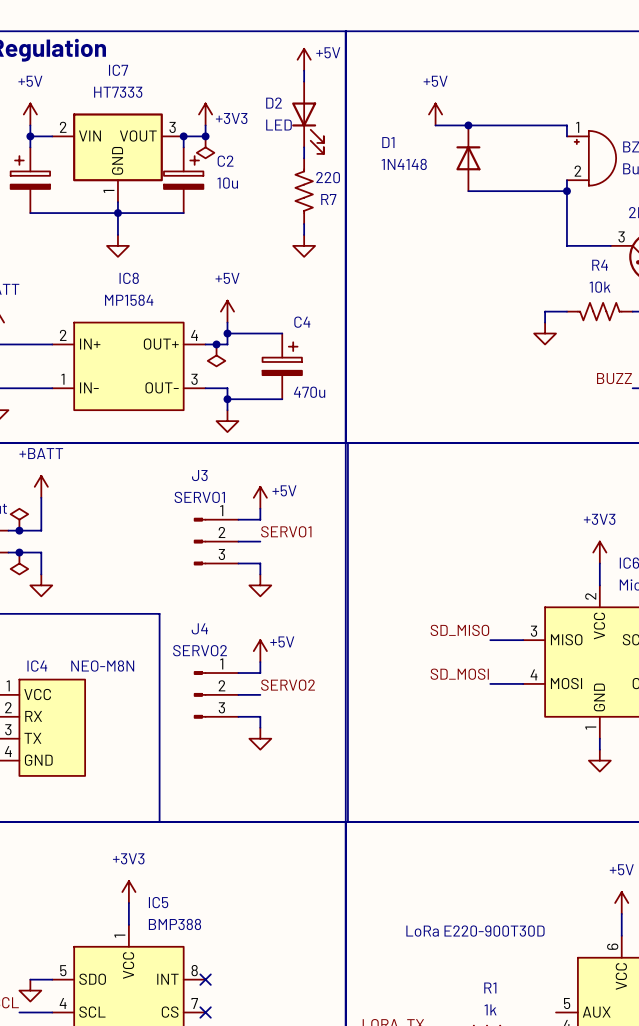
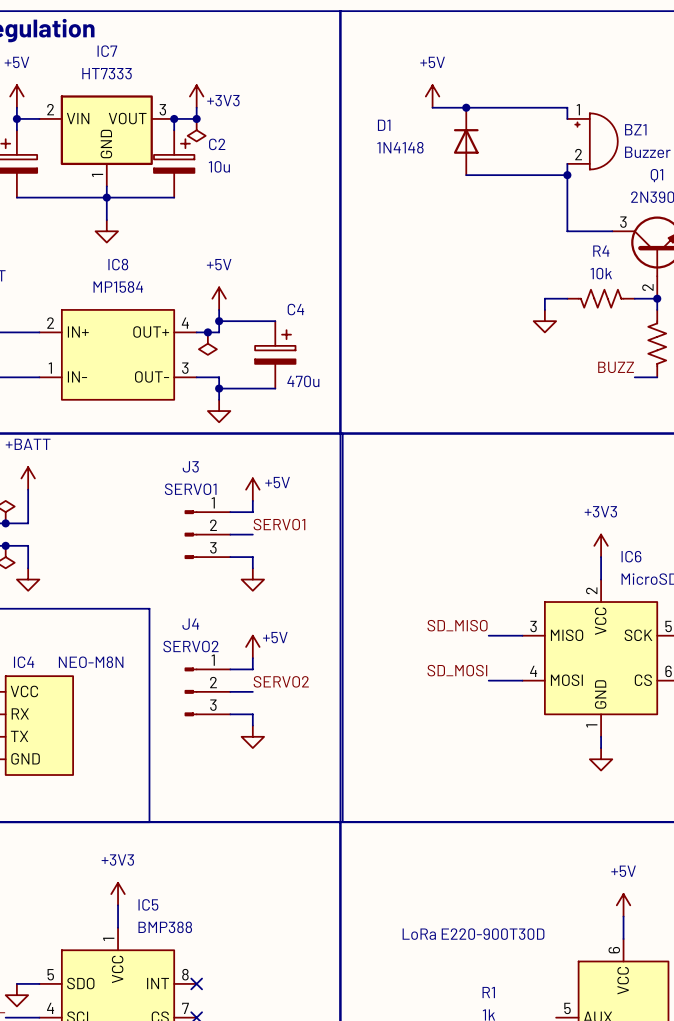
power symbol: +5V (304, 59) -> none
wire: (304, 70) (304, 81) -> none
D2: LED (307, 117) -> none
wire: (304, 147) (304, 158) -> none
R7: 220 (304, 191) -> none
wire: (304, 224) (304, 234) -> none
power symbol: (304, 245) -> none

